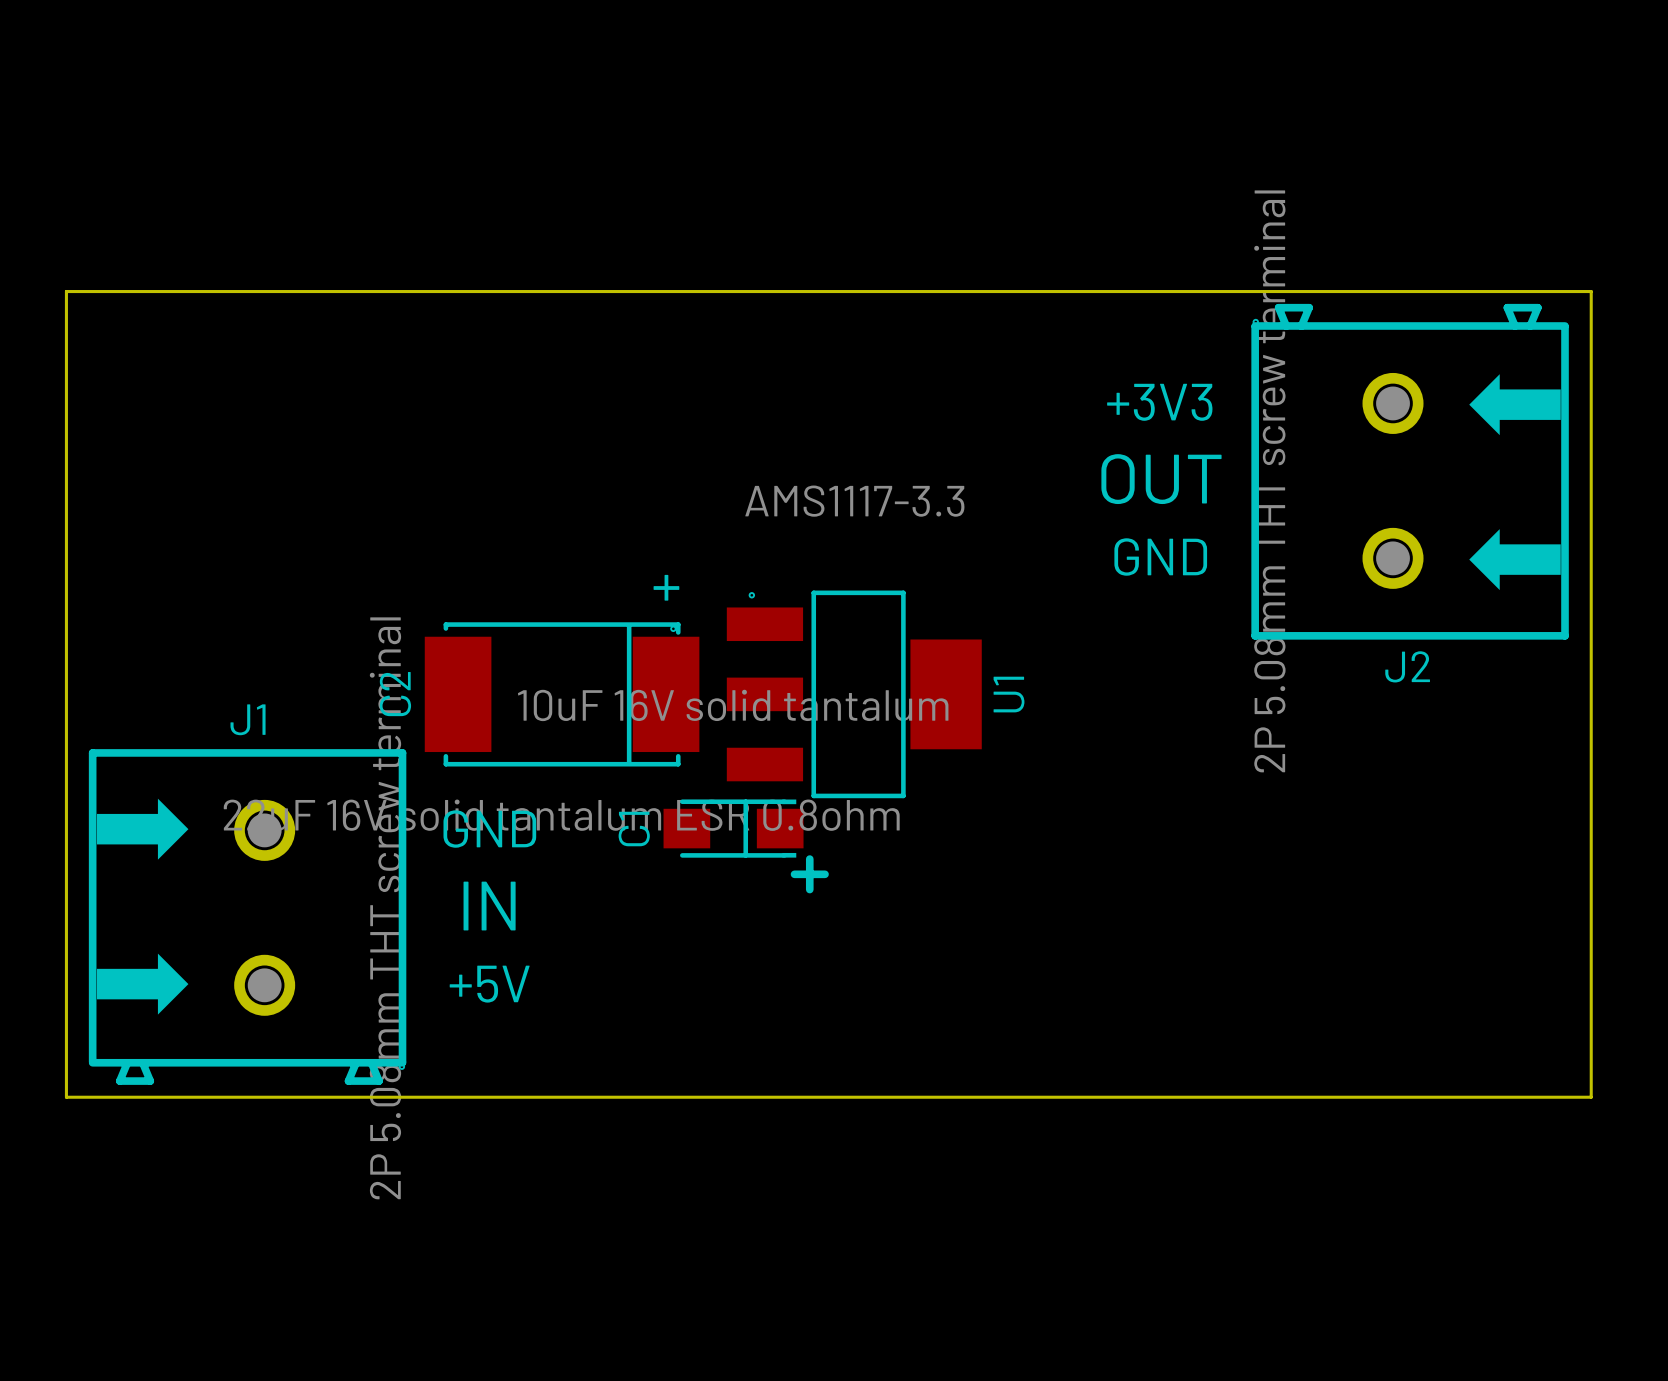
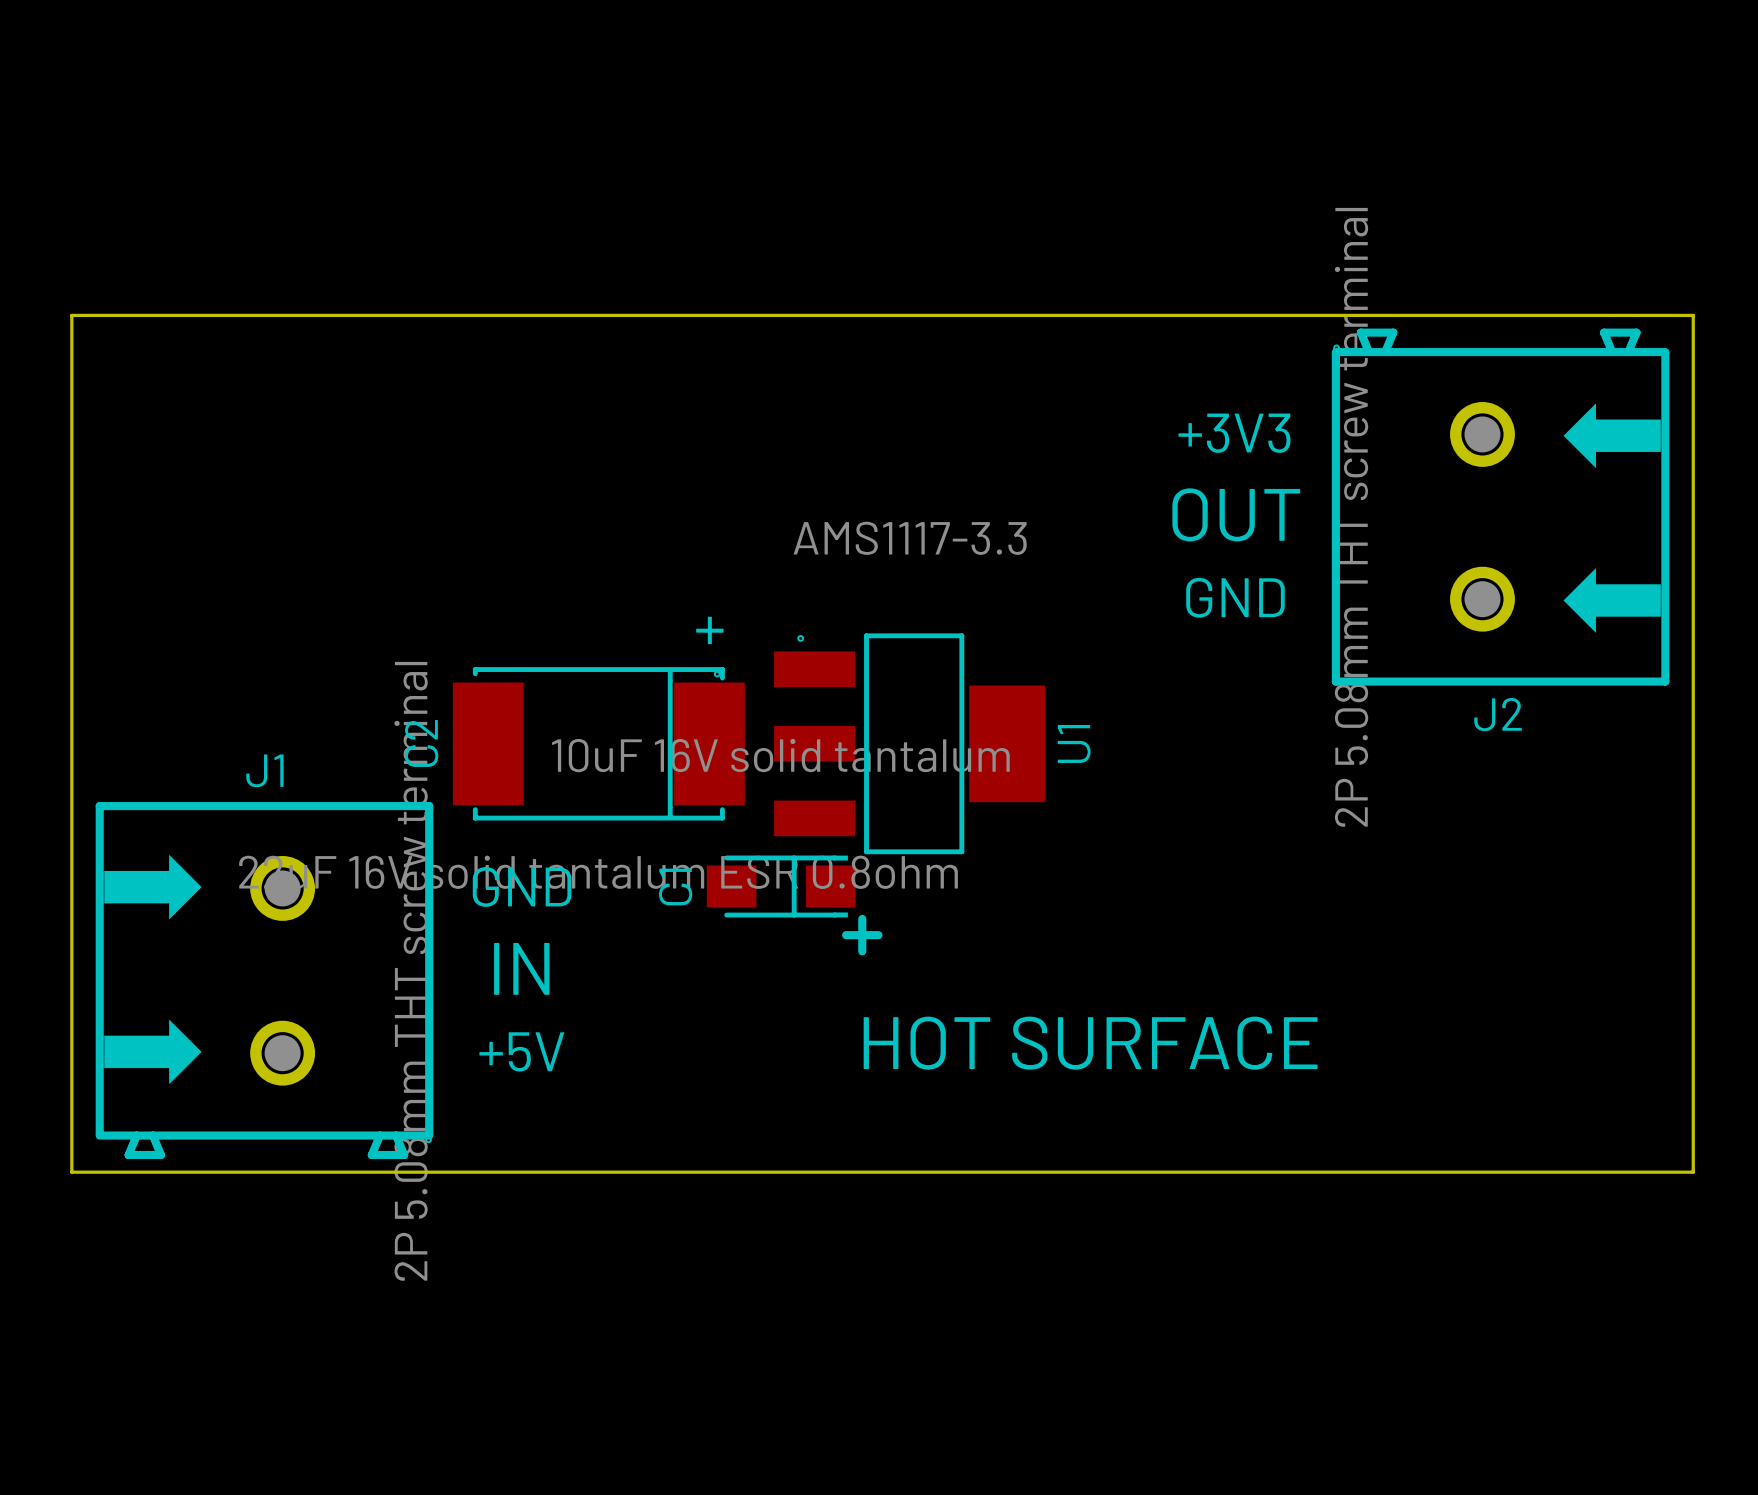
text: none -> HOT SURFACE (1090, 1043)

